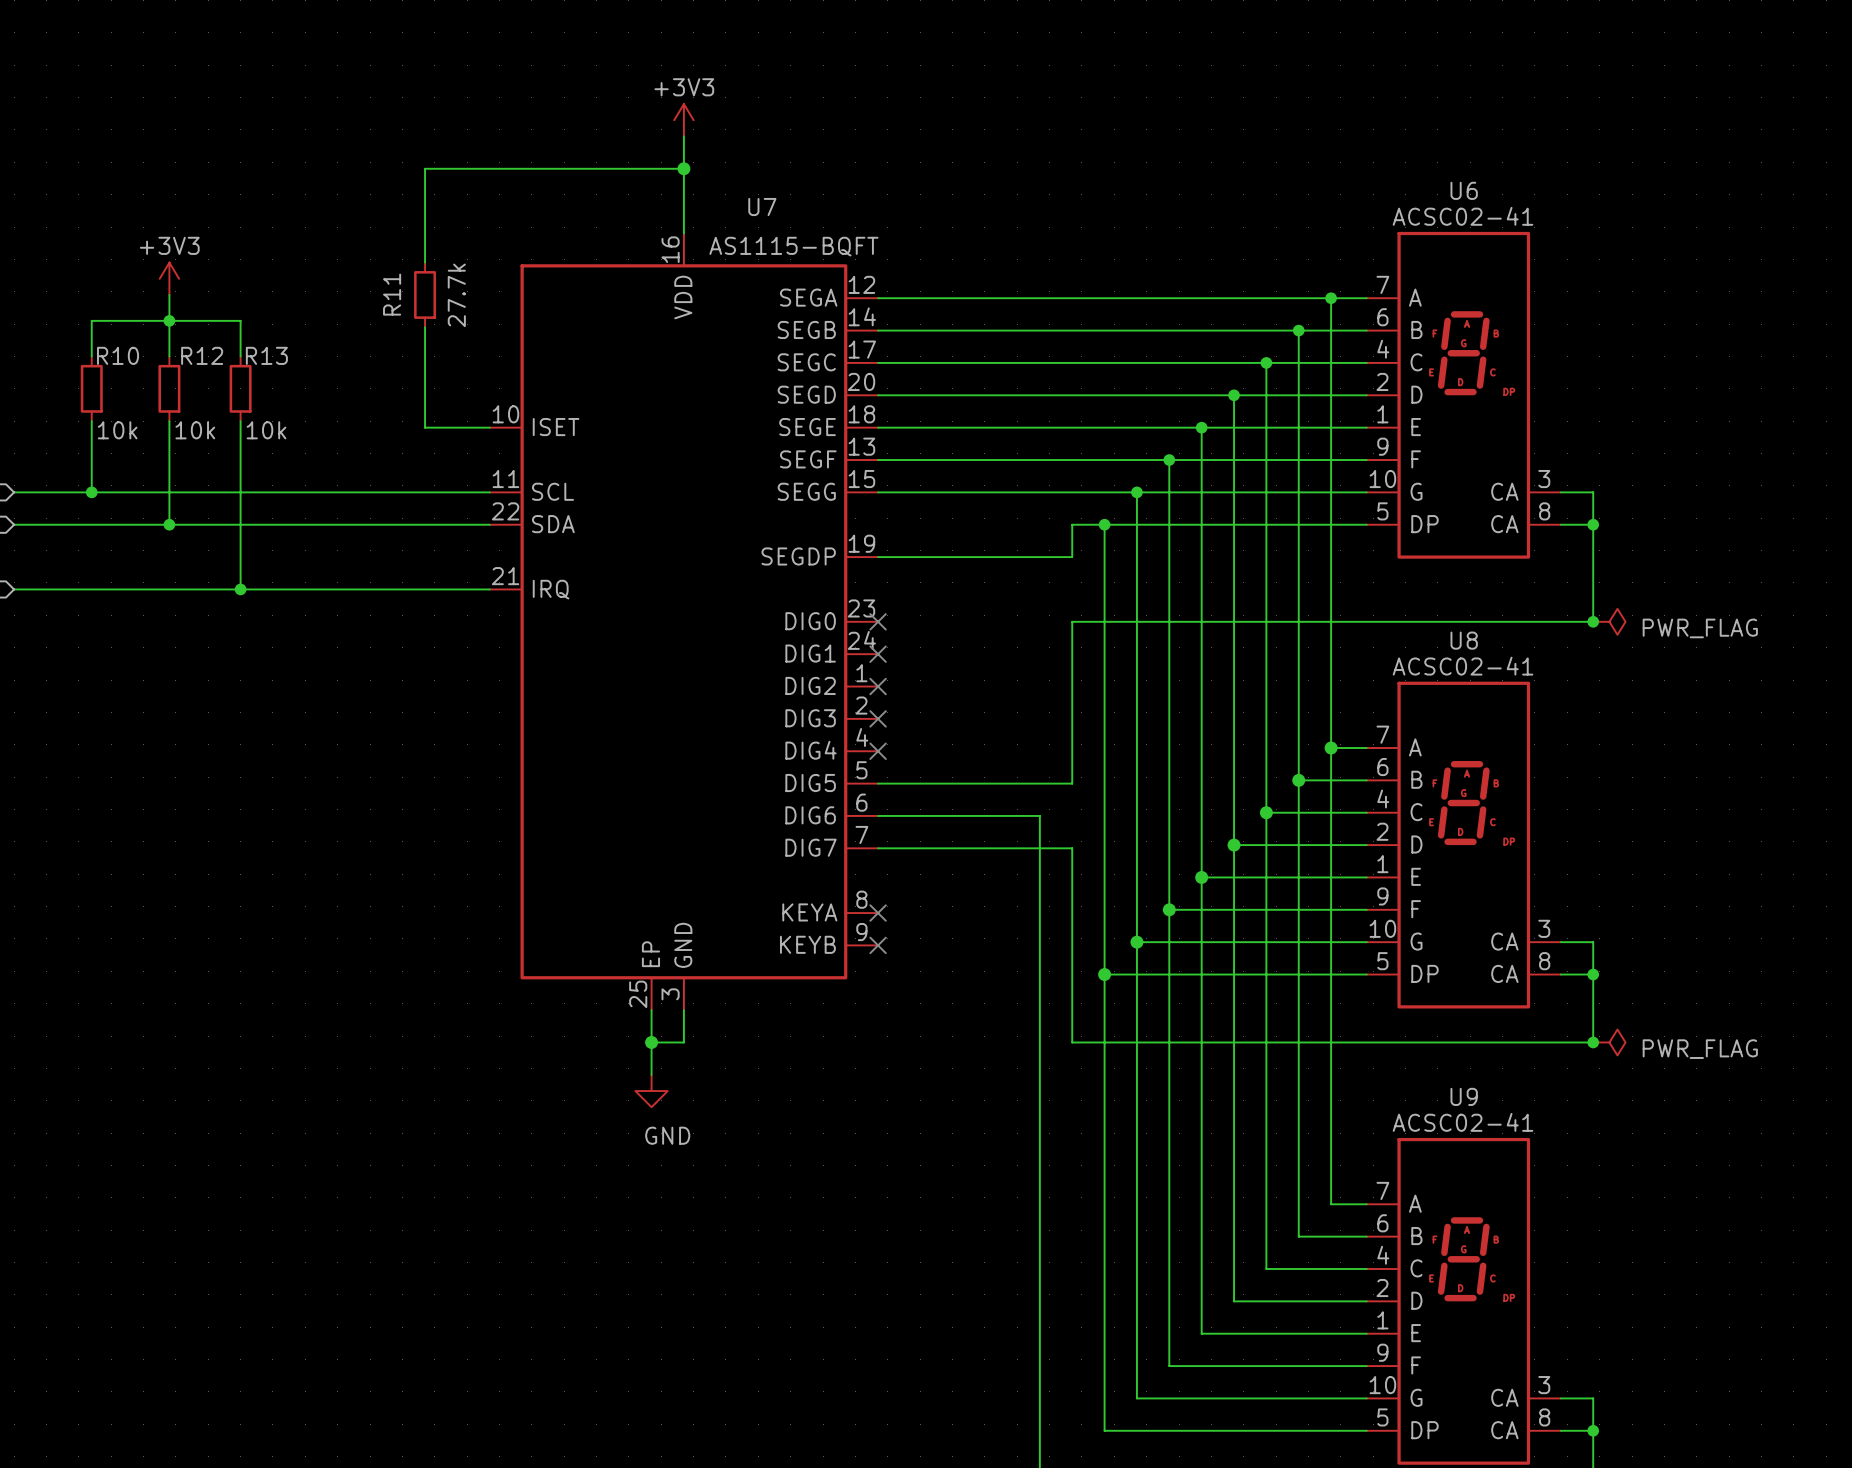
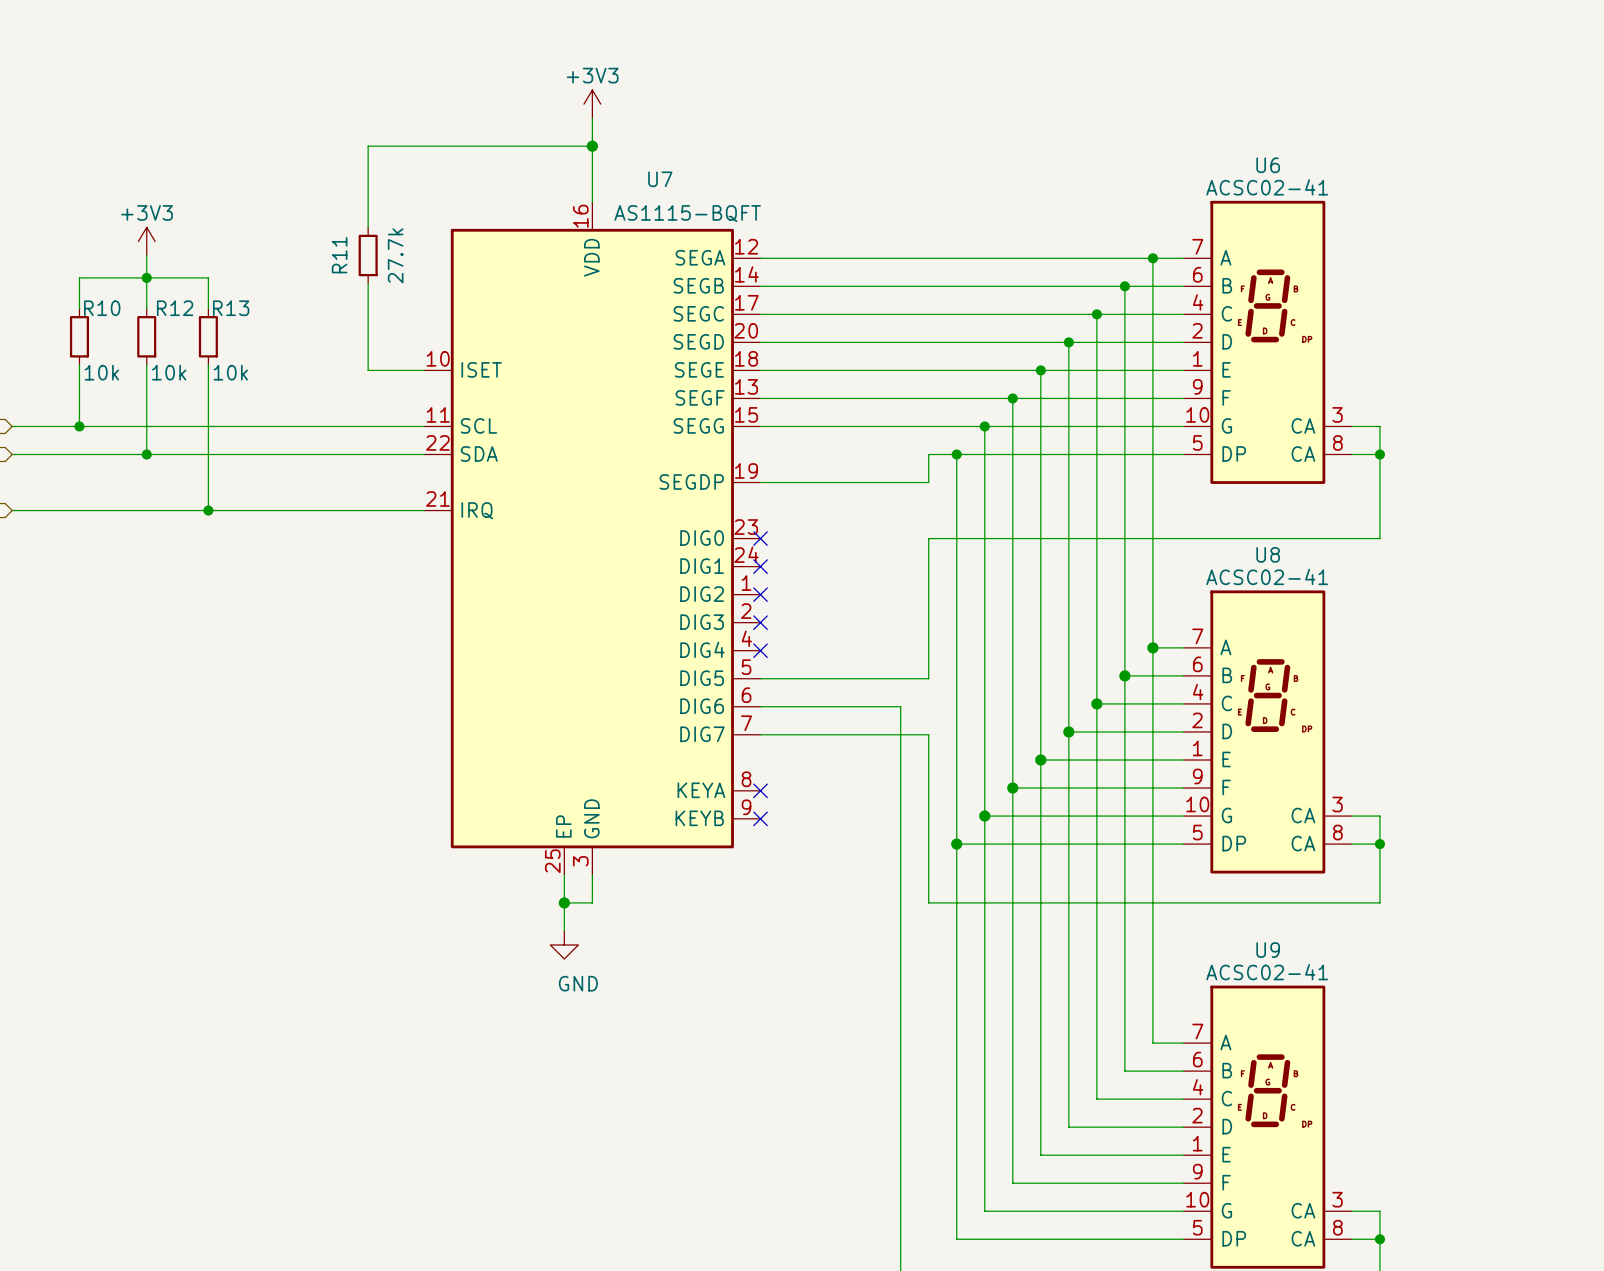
junction: (1593, 621) -> none
power symbol: PWR_FLAG (1609, 621) -> none
junction: (1593, 1042) -> none
power symbol: PWR_FLAG (1609, 1042) -> none

